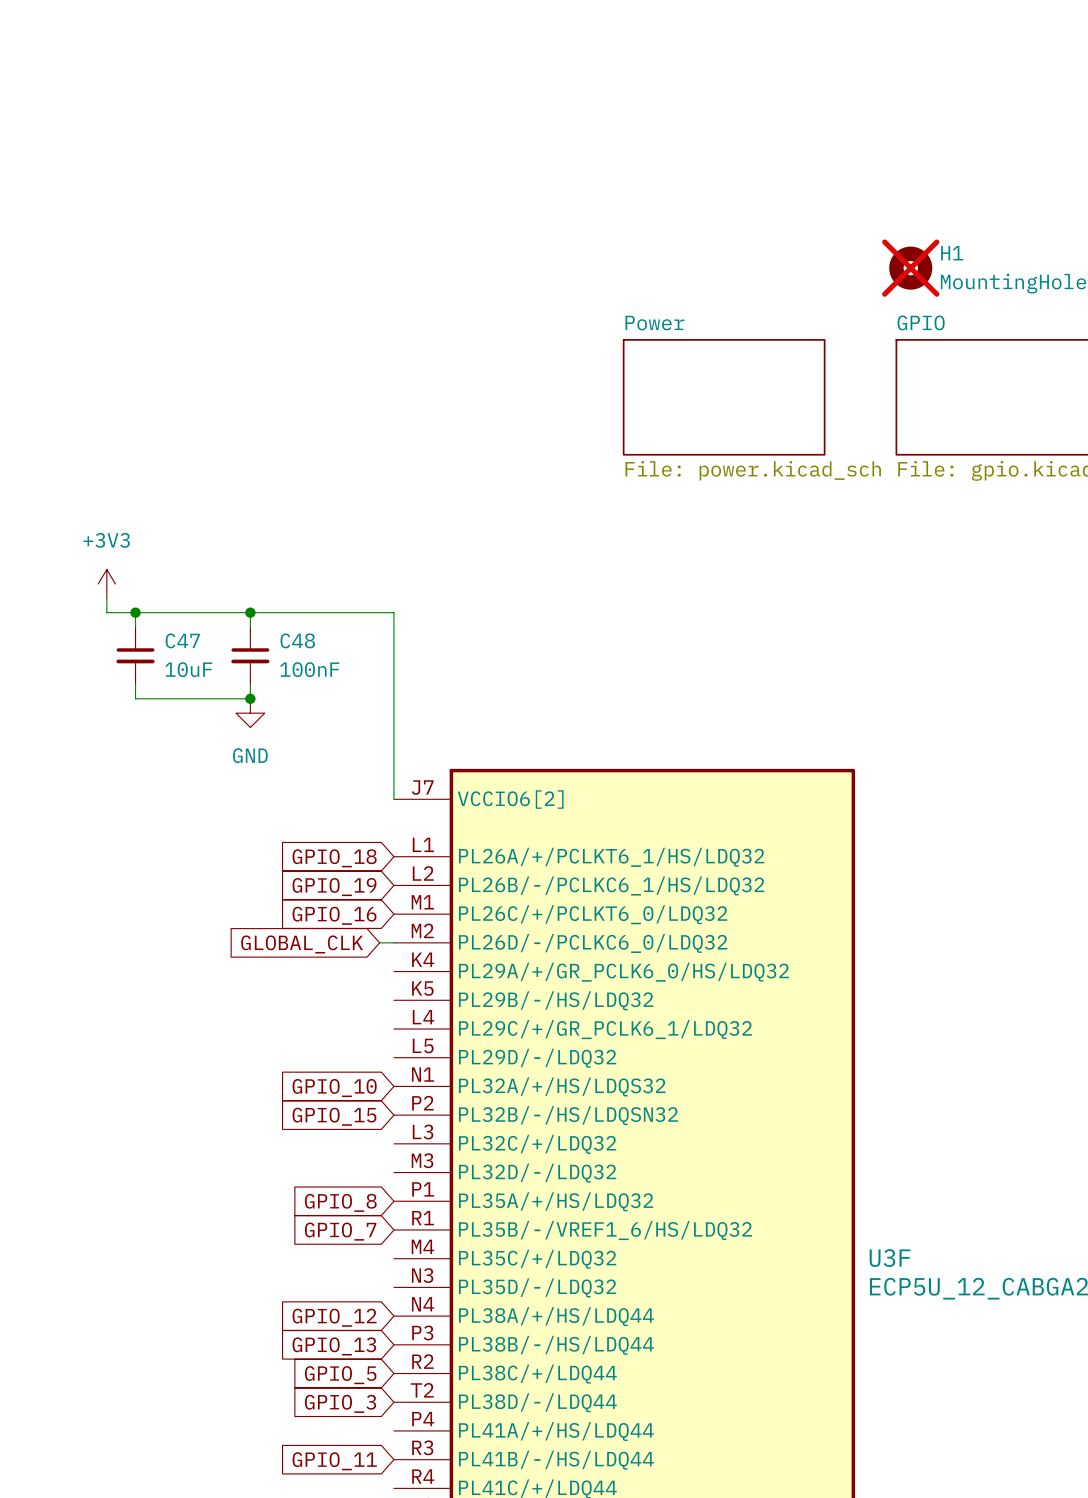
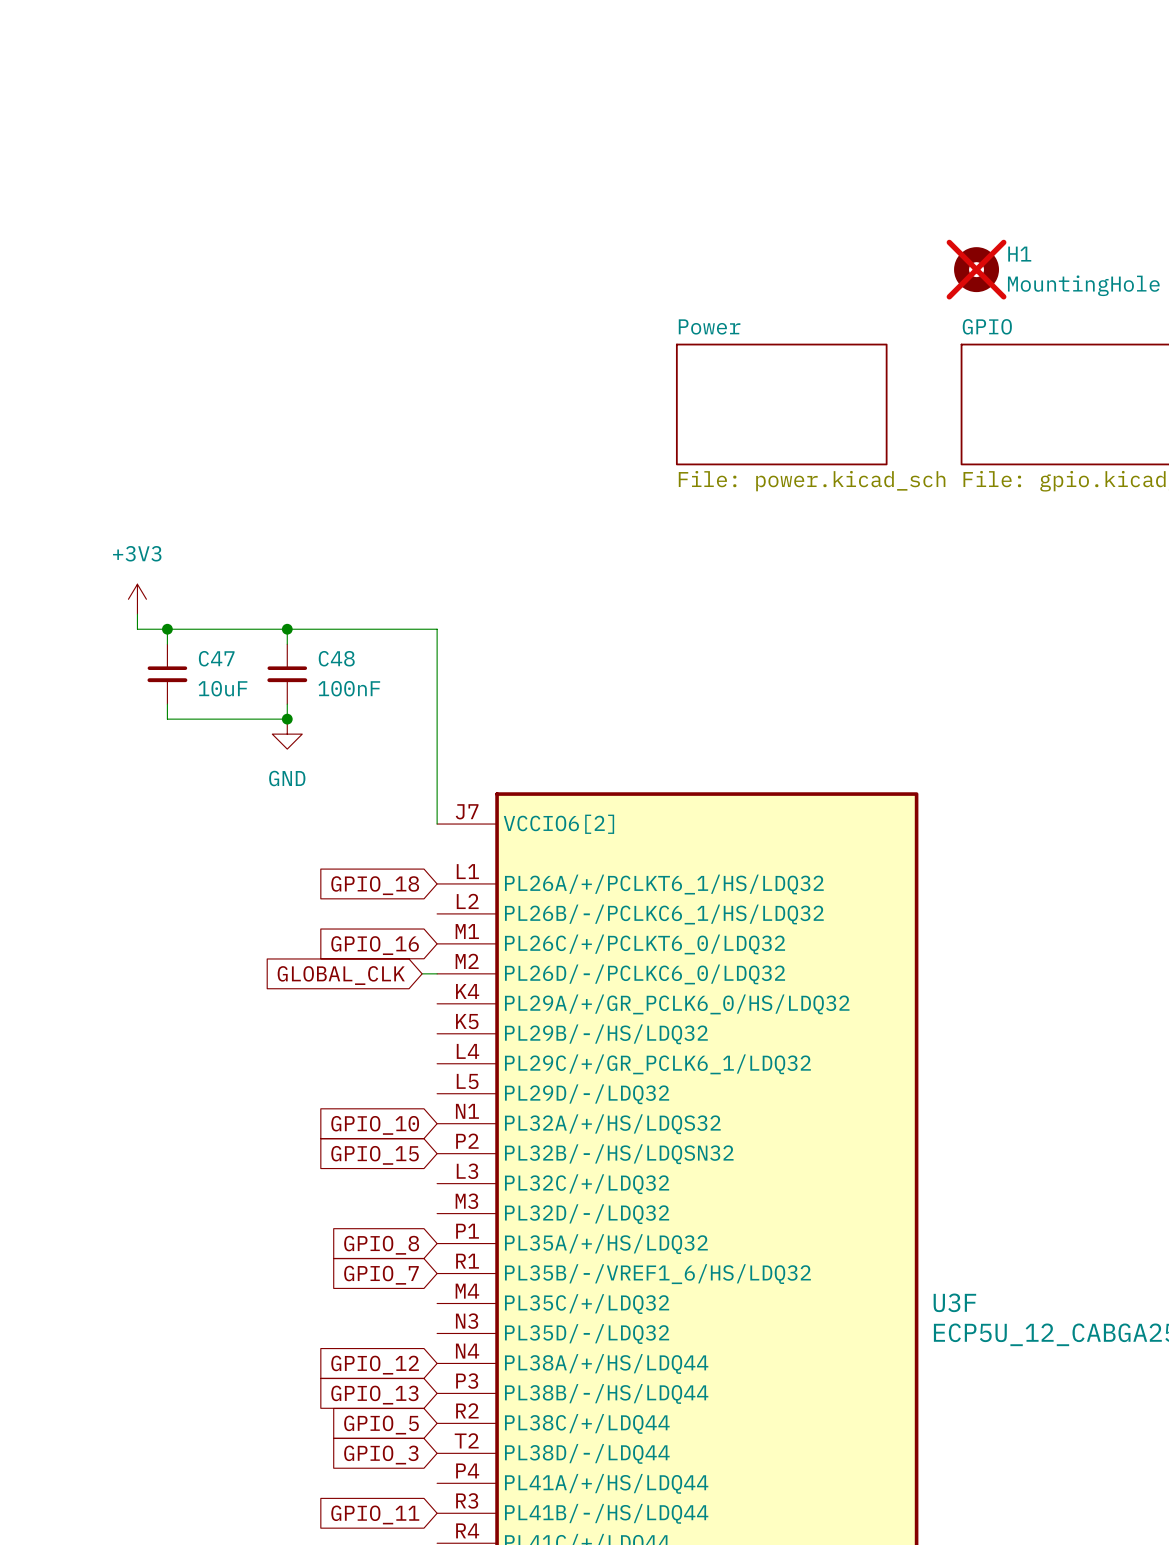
global label: GPIO_19 (334, 887) -> none

